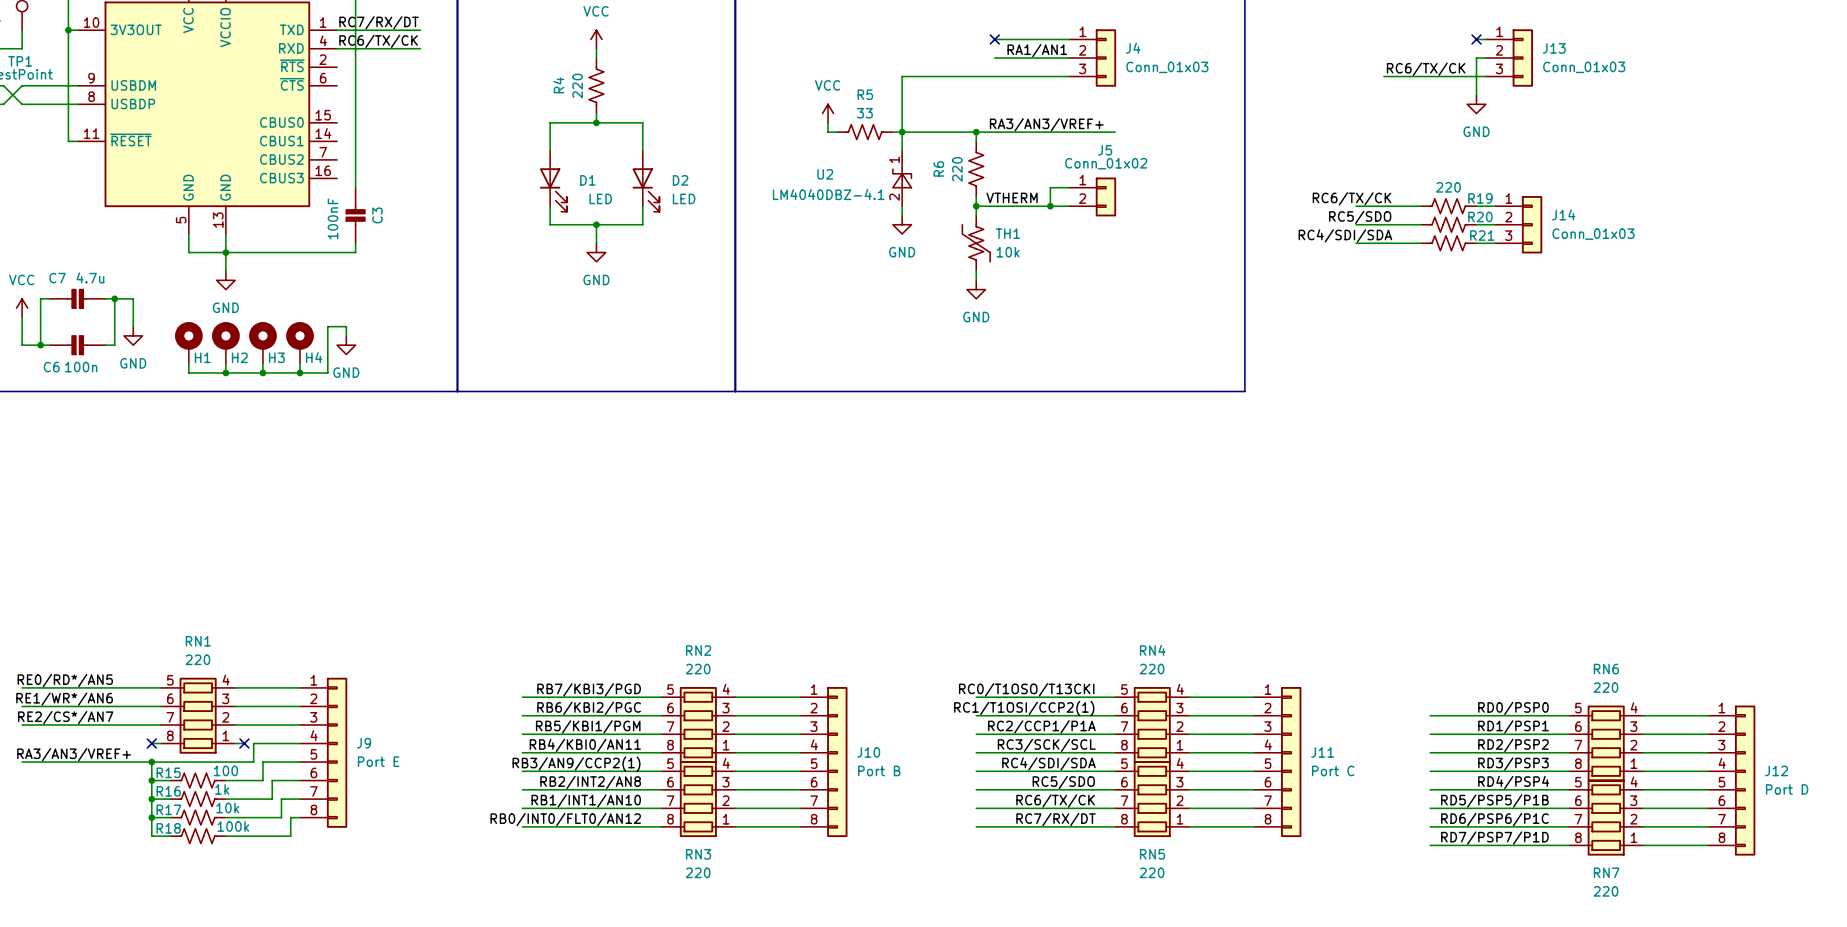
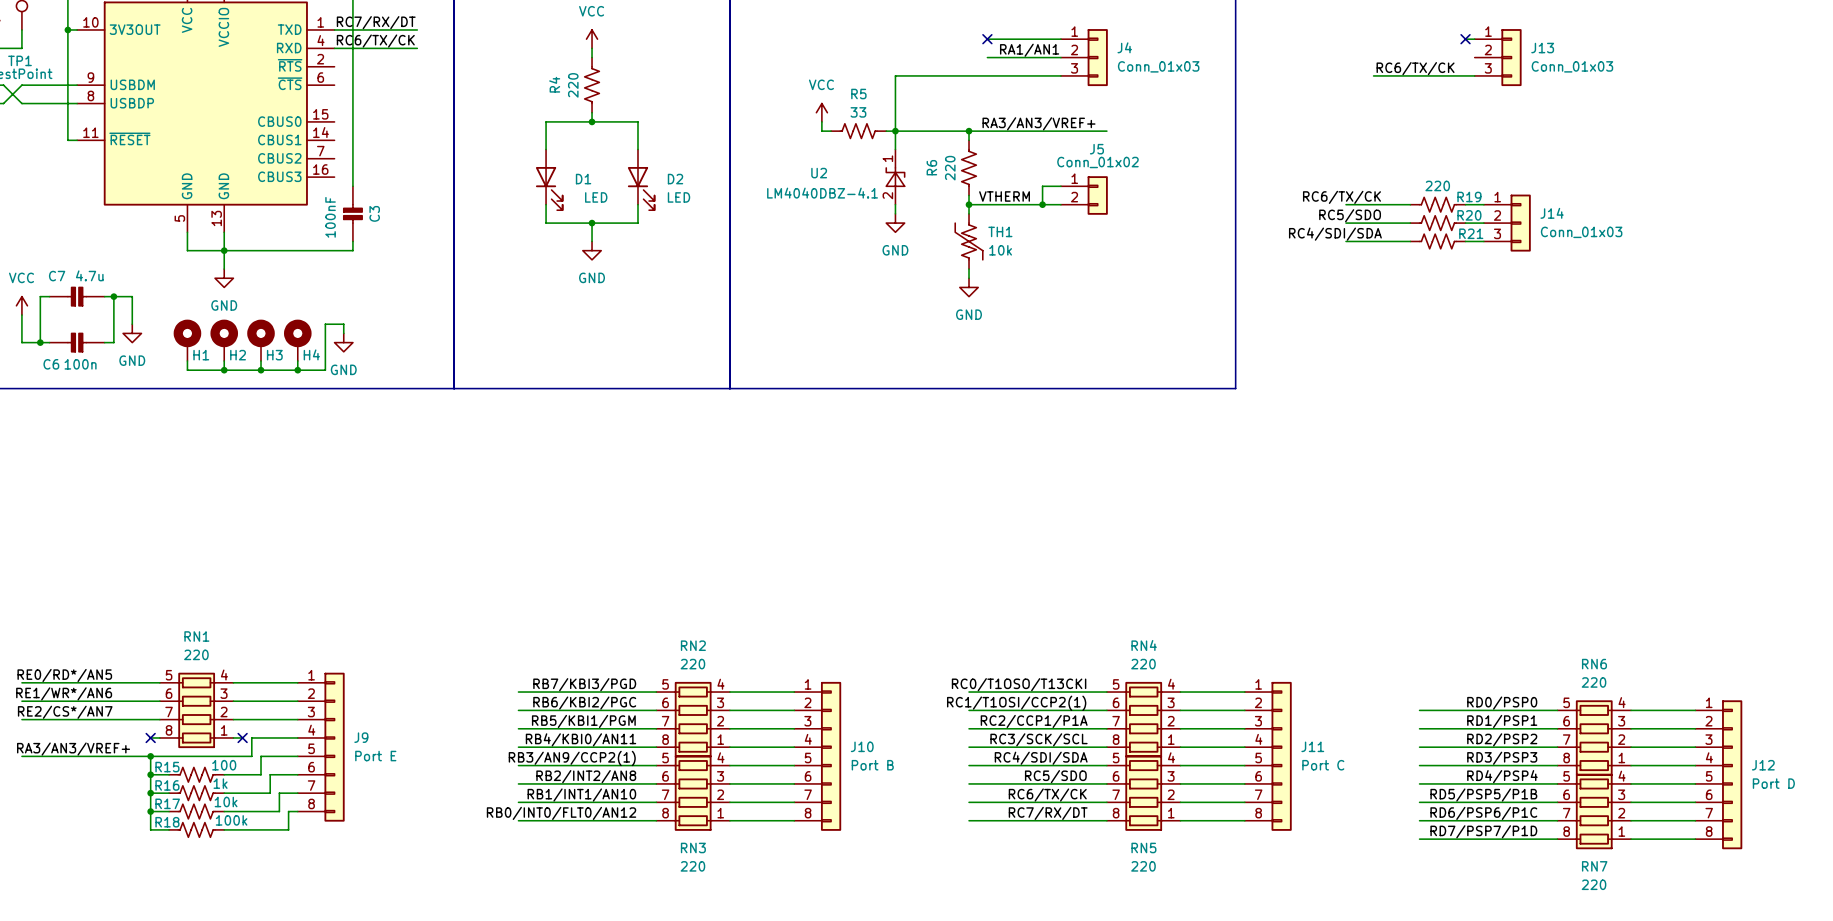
wire: (1485, 58) (1476, 58) (1476, 95) -> none
power symbol: GND (1476, 104) -> none

